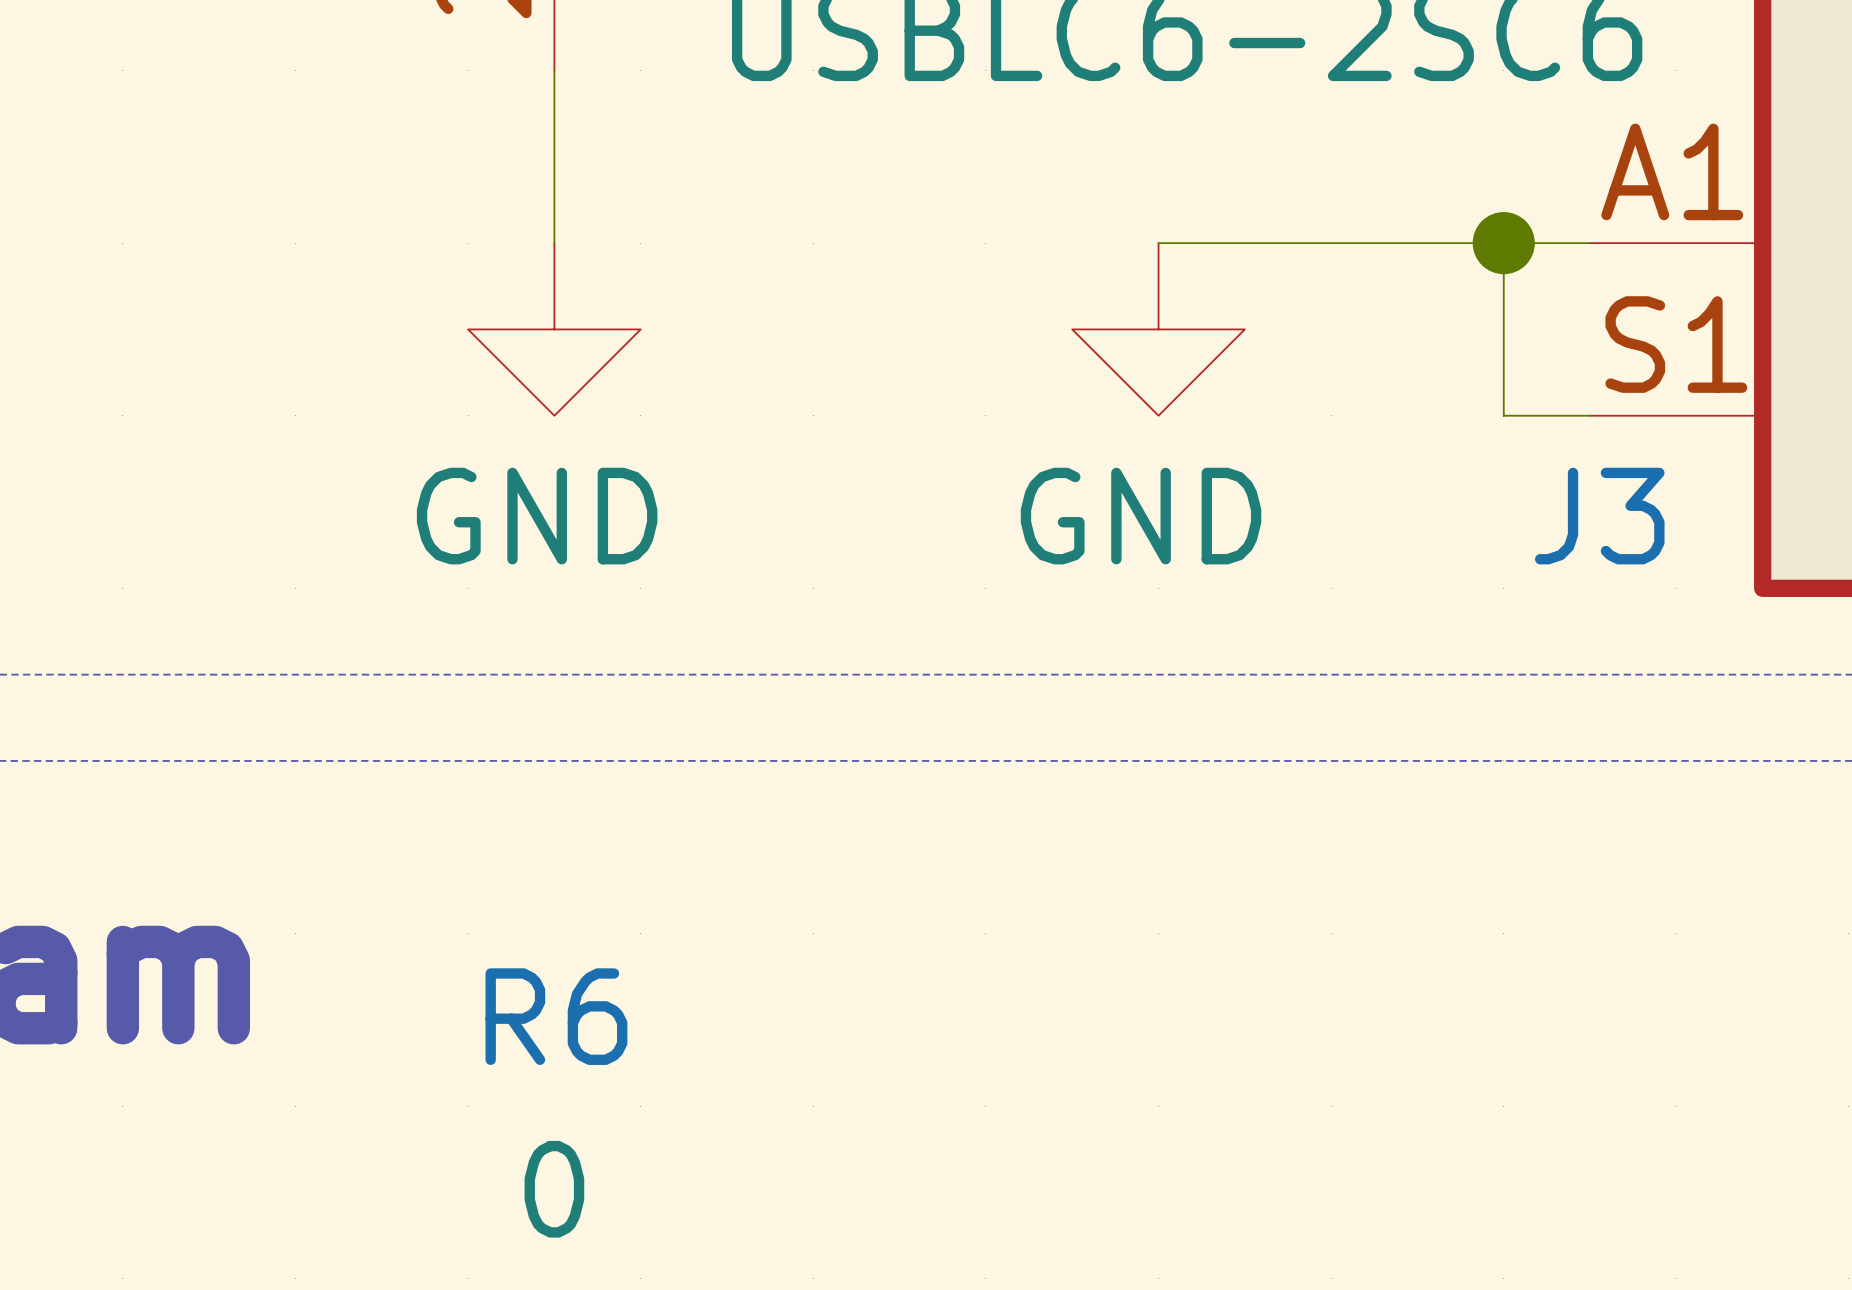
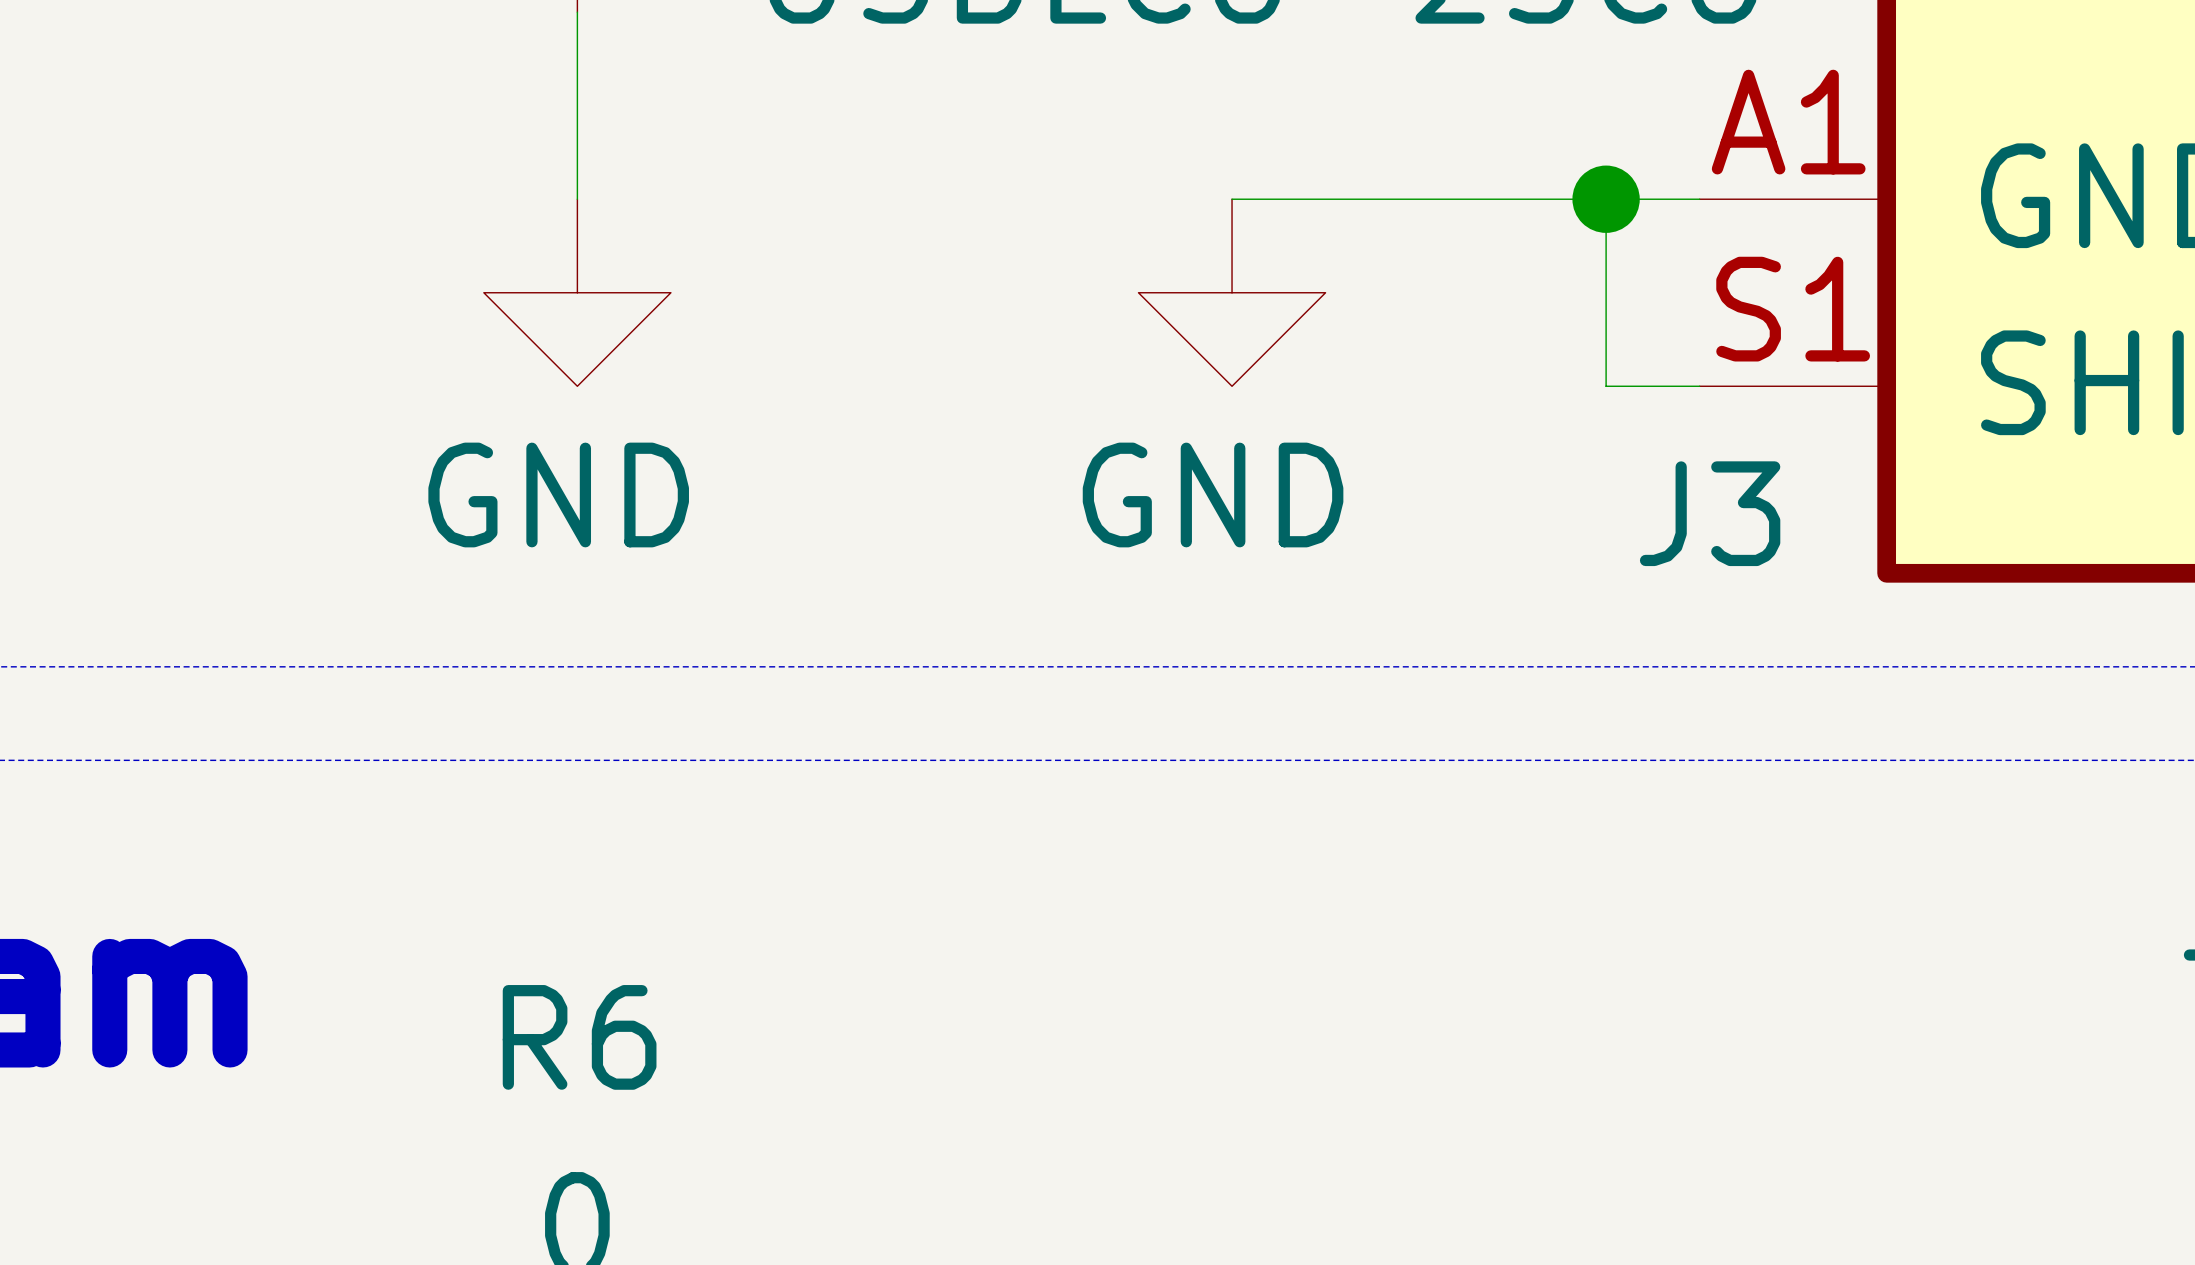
J3 name position: J3 (1599, 516) -> J3 (1710, 513)

